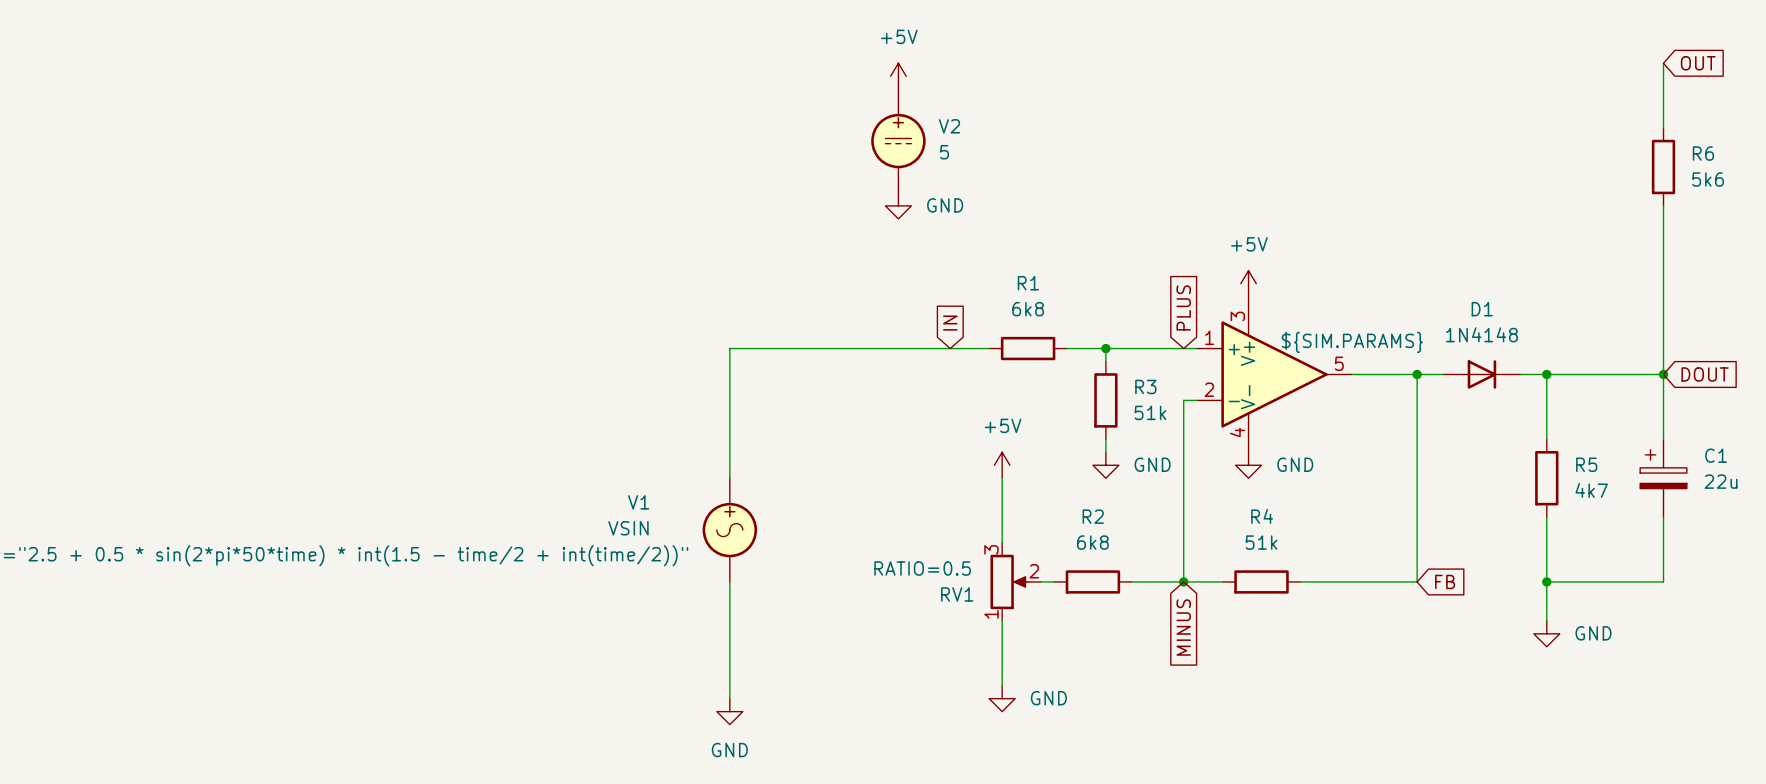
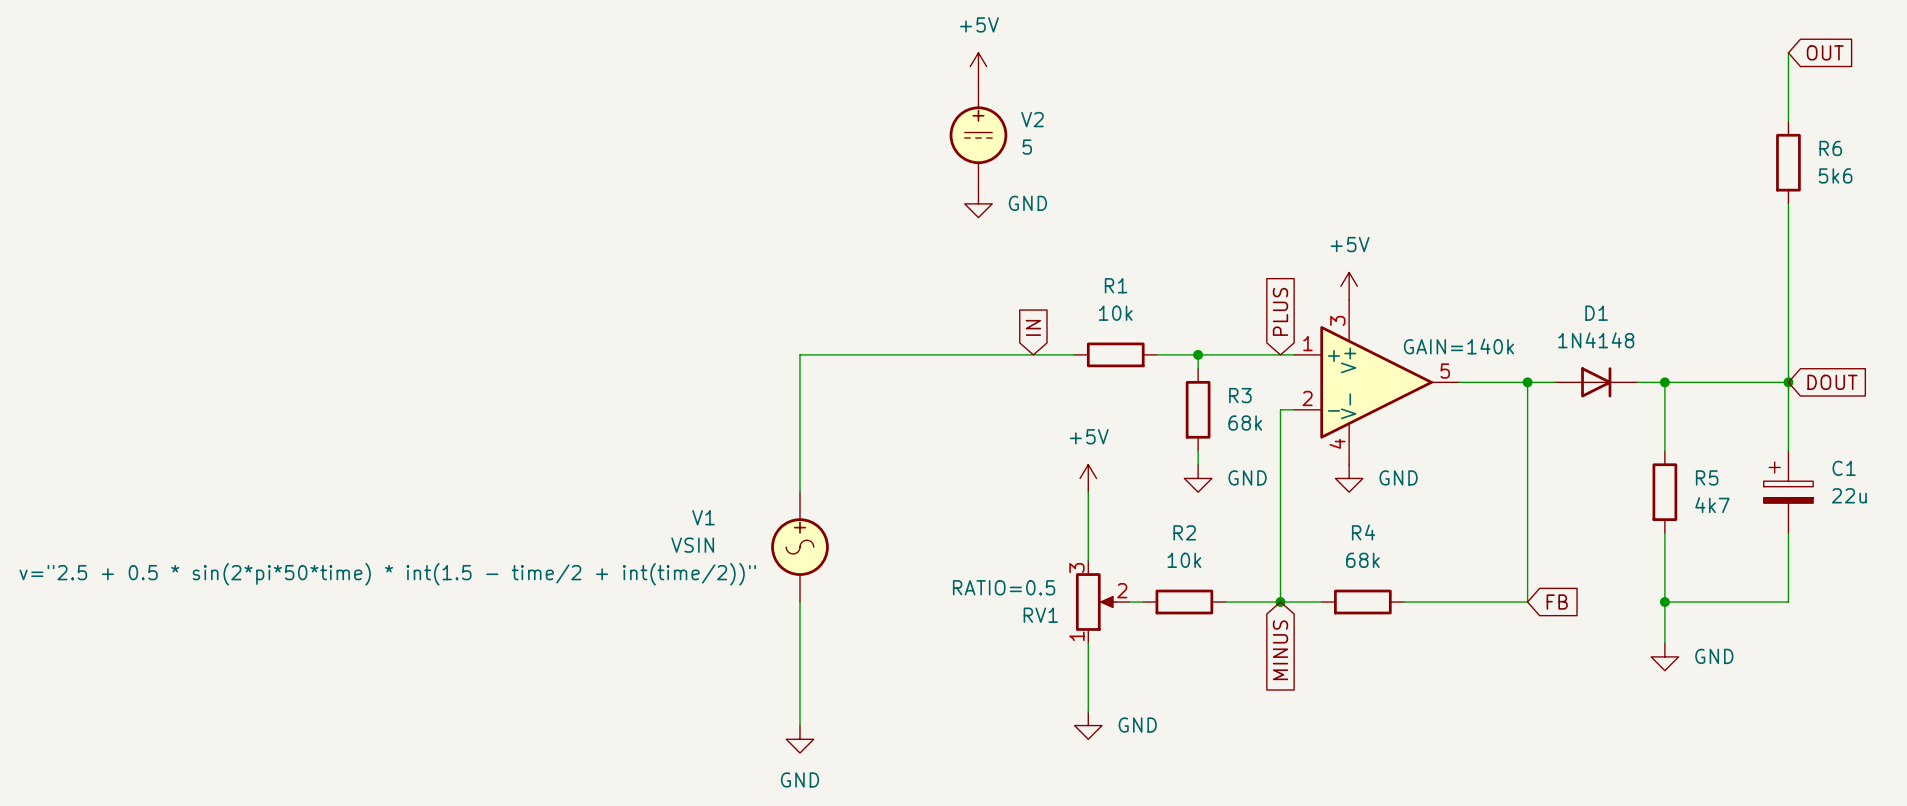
R1 value: 6k8 (1028, 309) -> 10k (1115, 313)
part value: ${SIM.PARAMS} (1352, 342) -> GAIN=140k (1458, 346)
R3 value: 51k (1150, 412) -> 68k (1245, 423)
R2 value: 6k8 (1092, 542) -> 10k (1184, 560)
R4 value: 51k (1261, 542) -> 68k (1362, 560)

